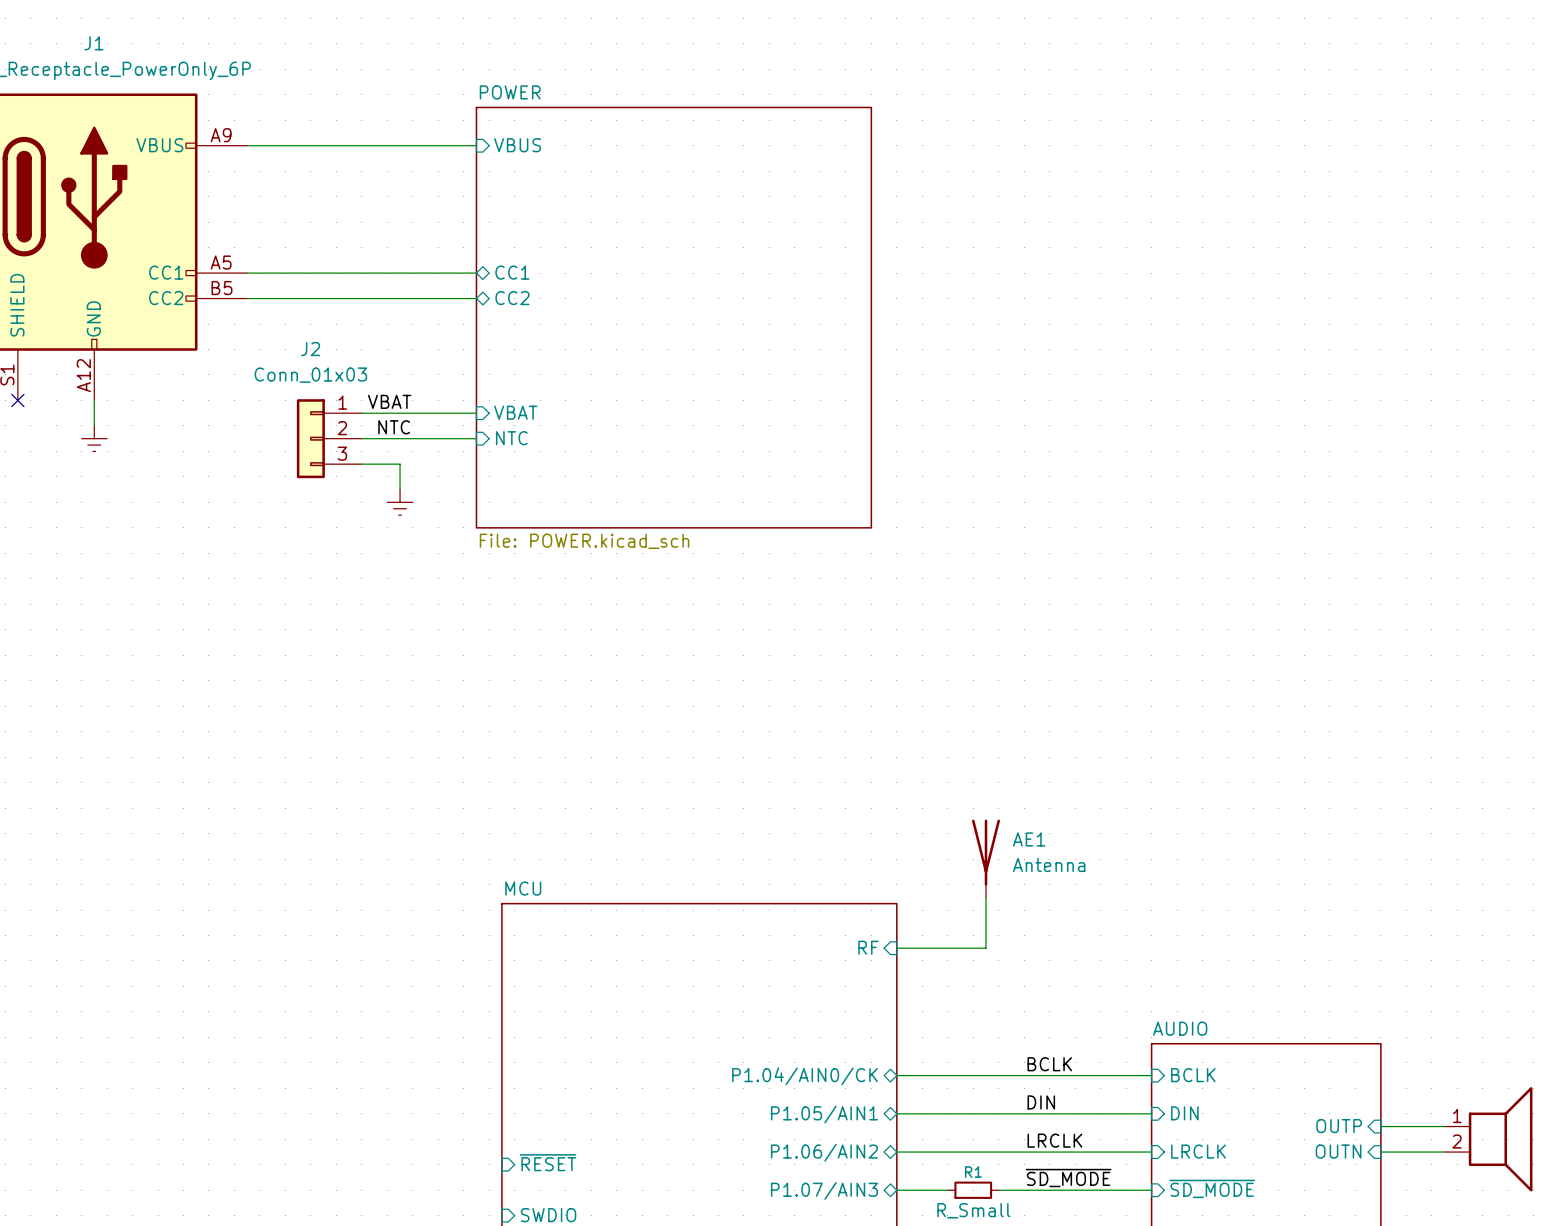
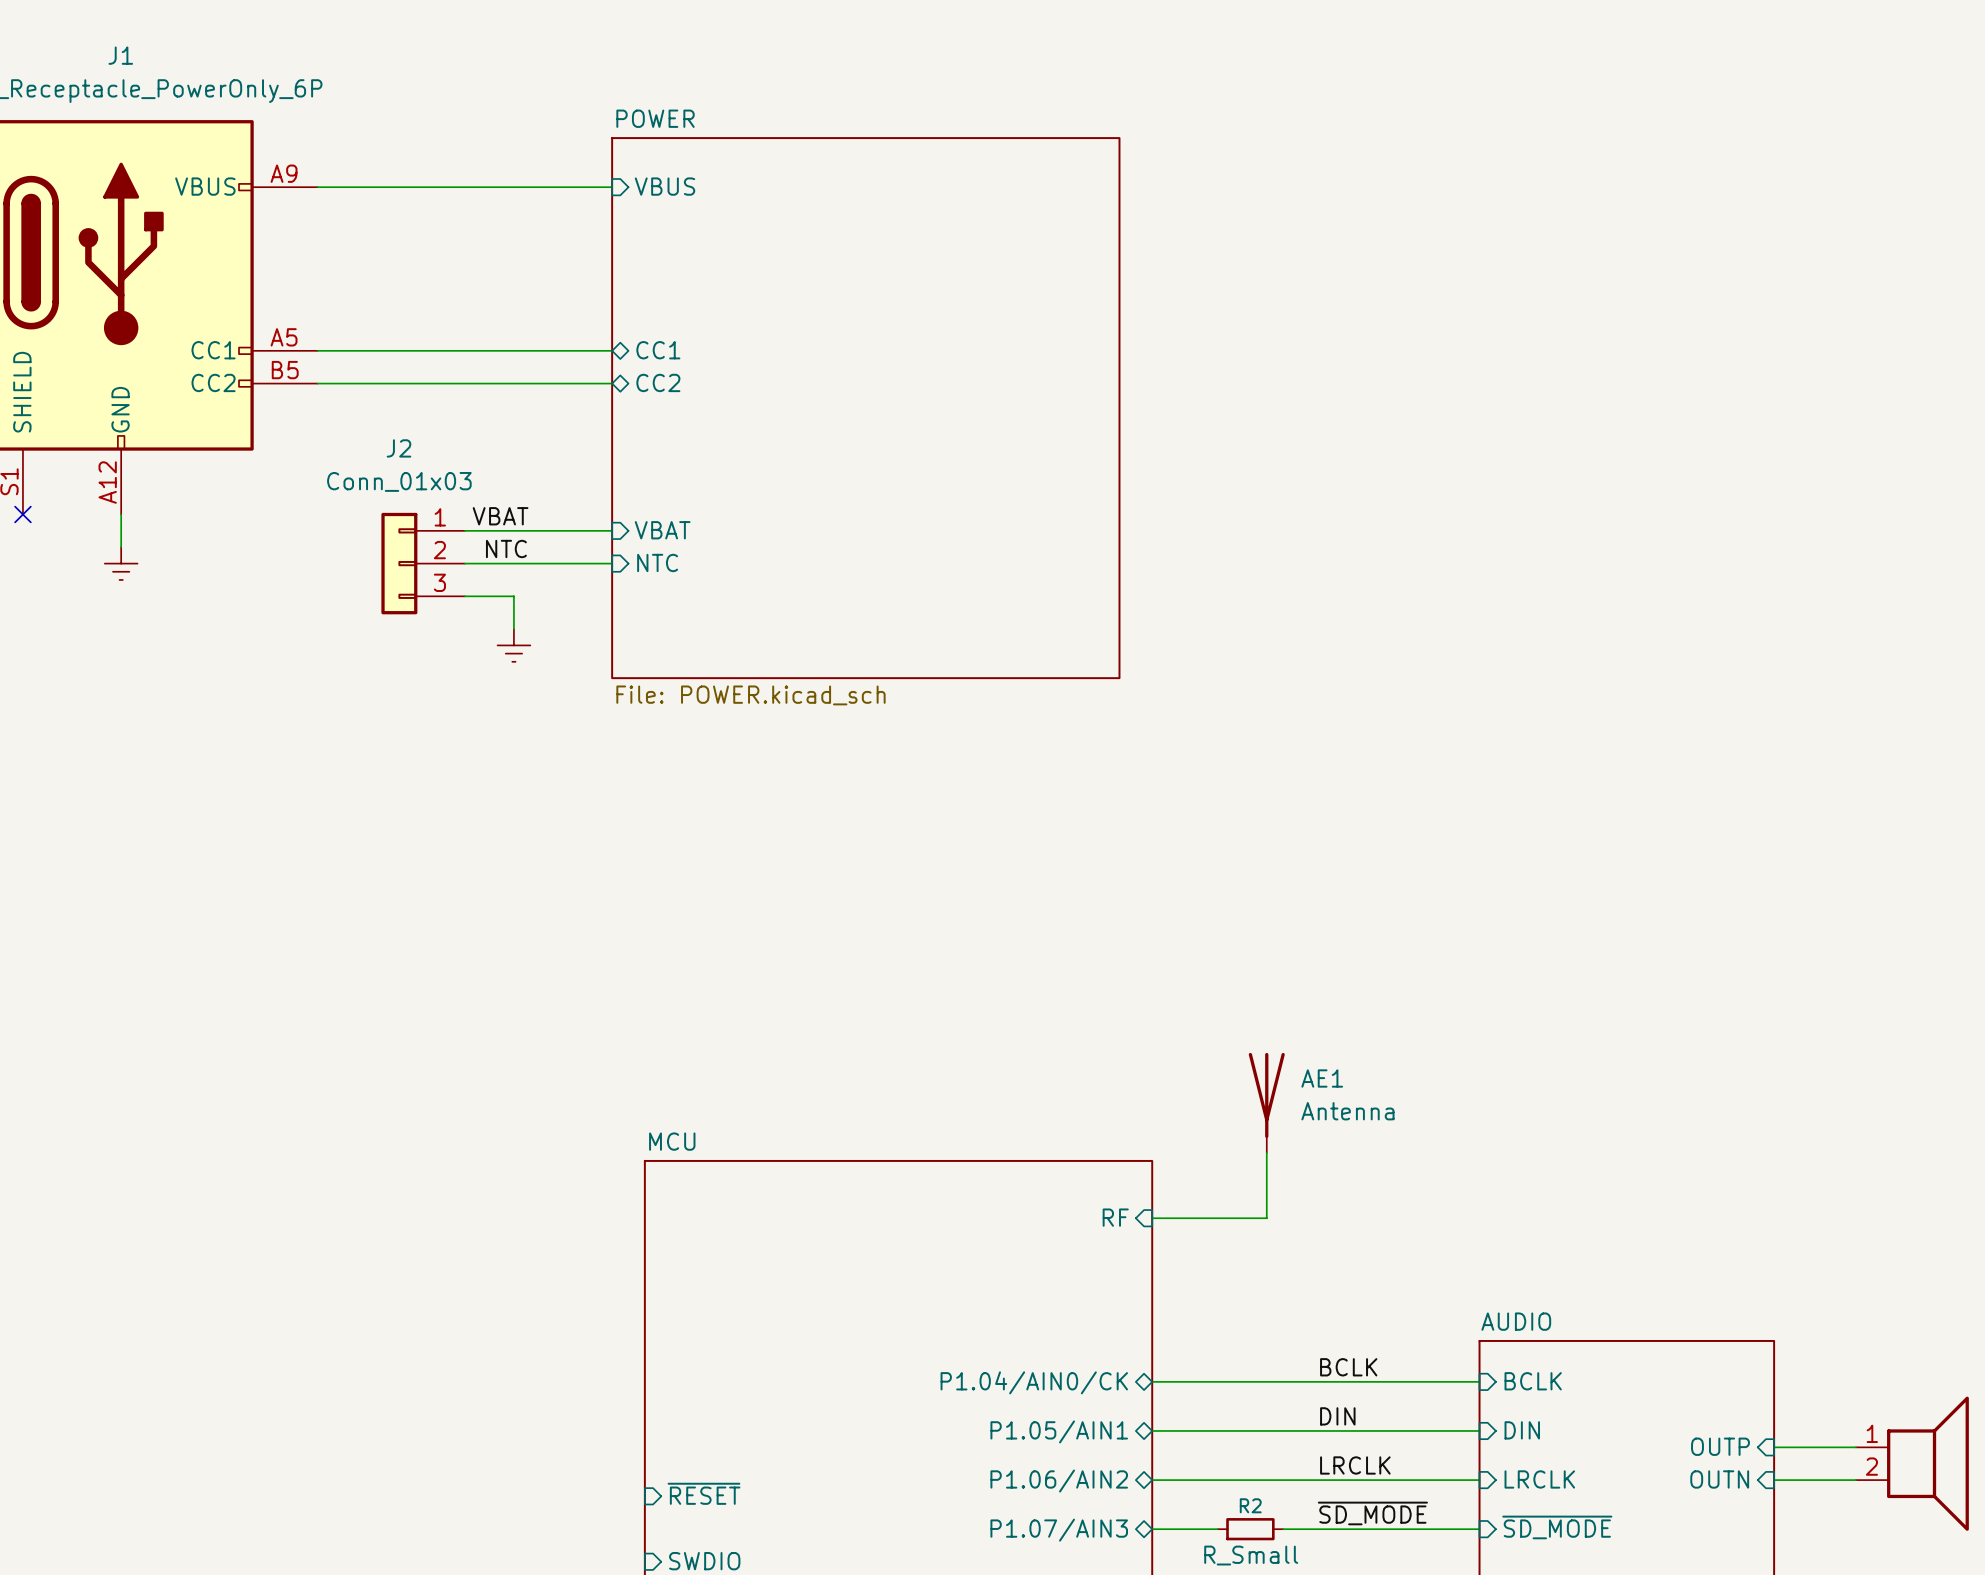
R1 name: R1 (973, 1172) -> R2 (1250, 1505)

